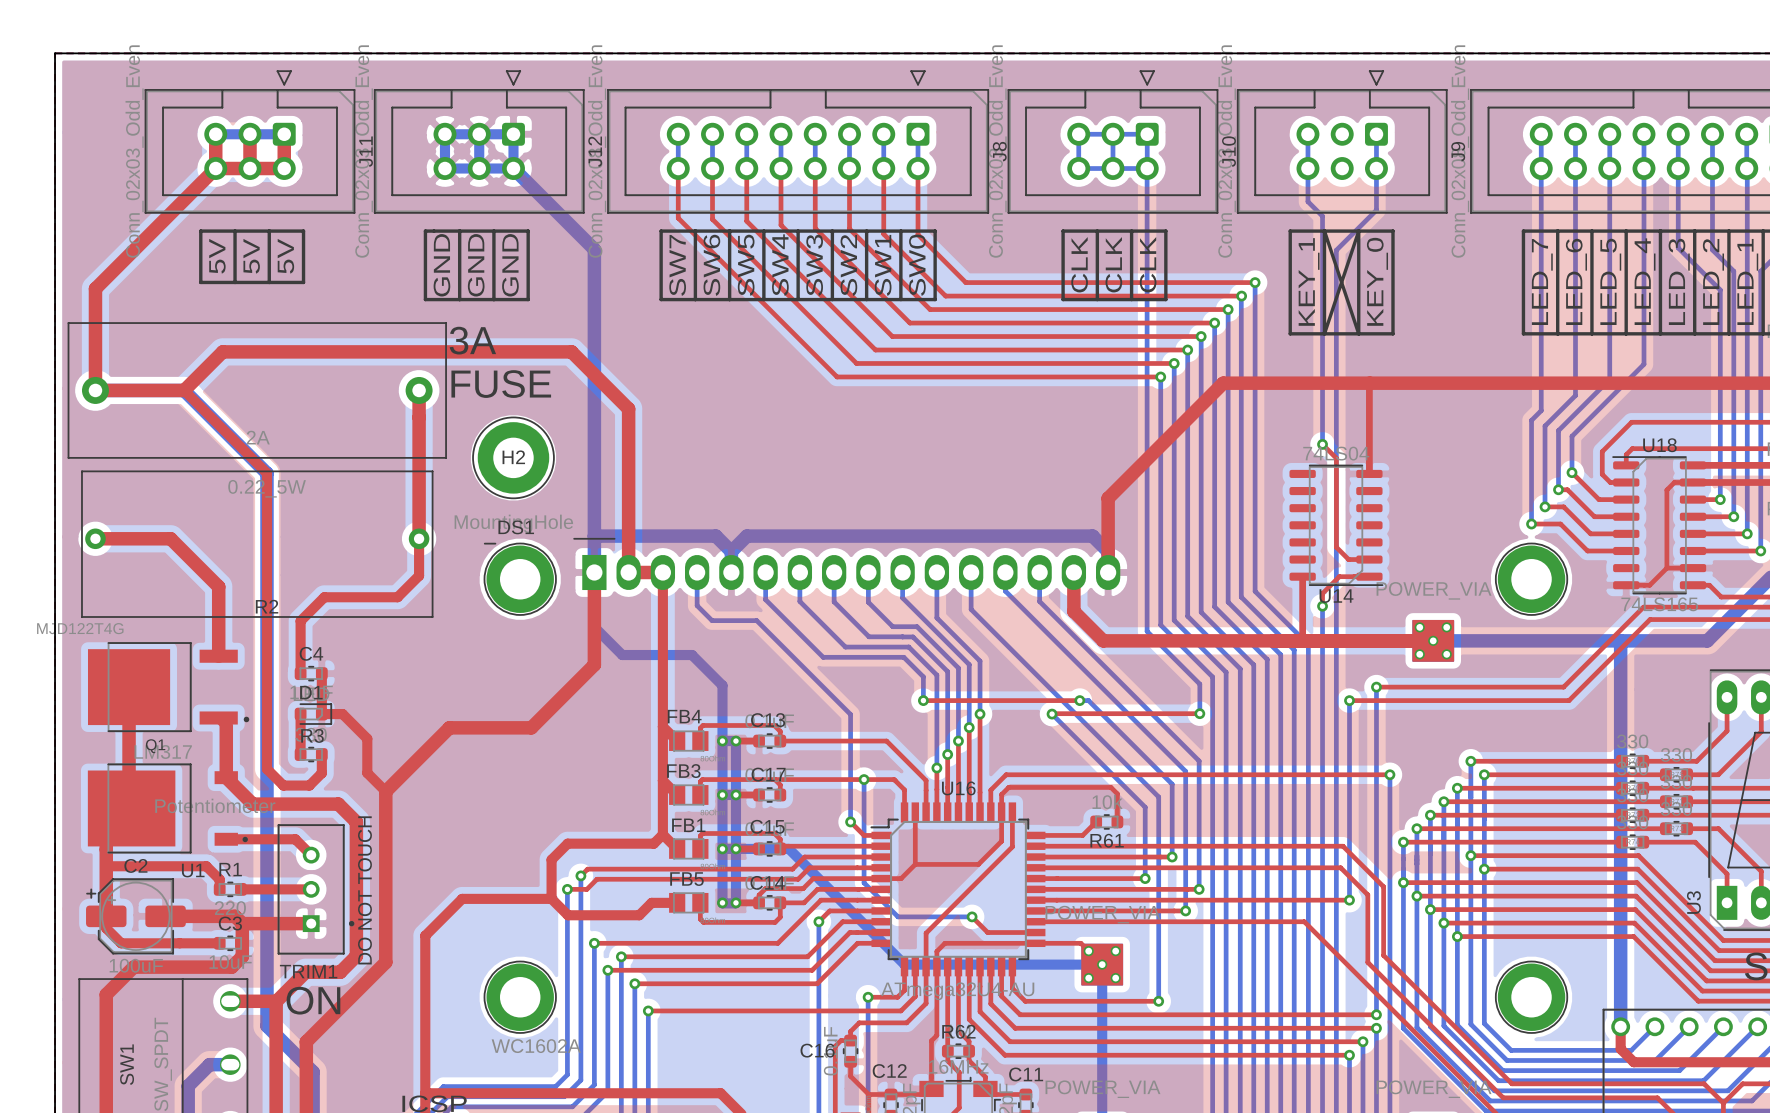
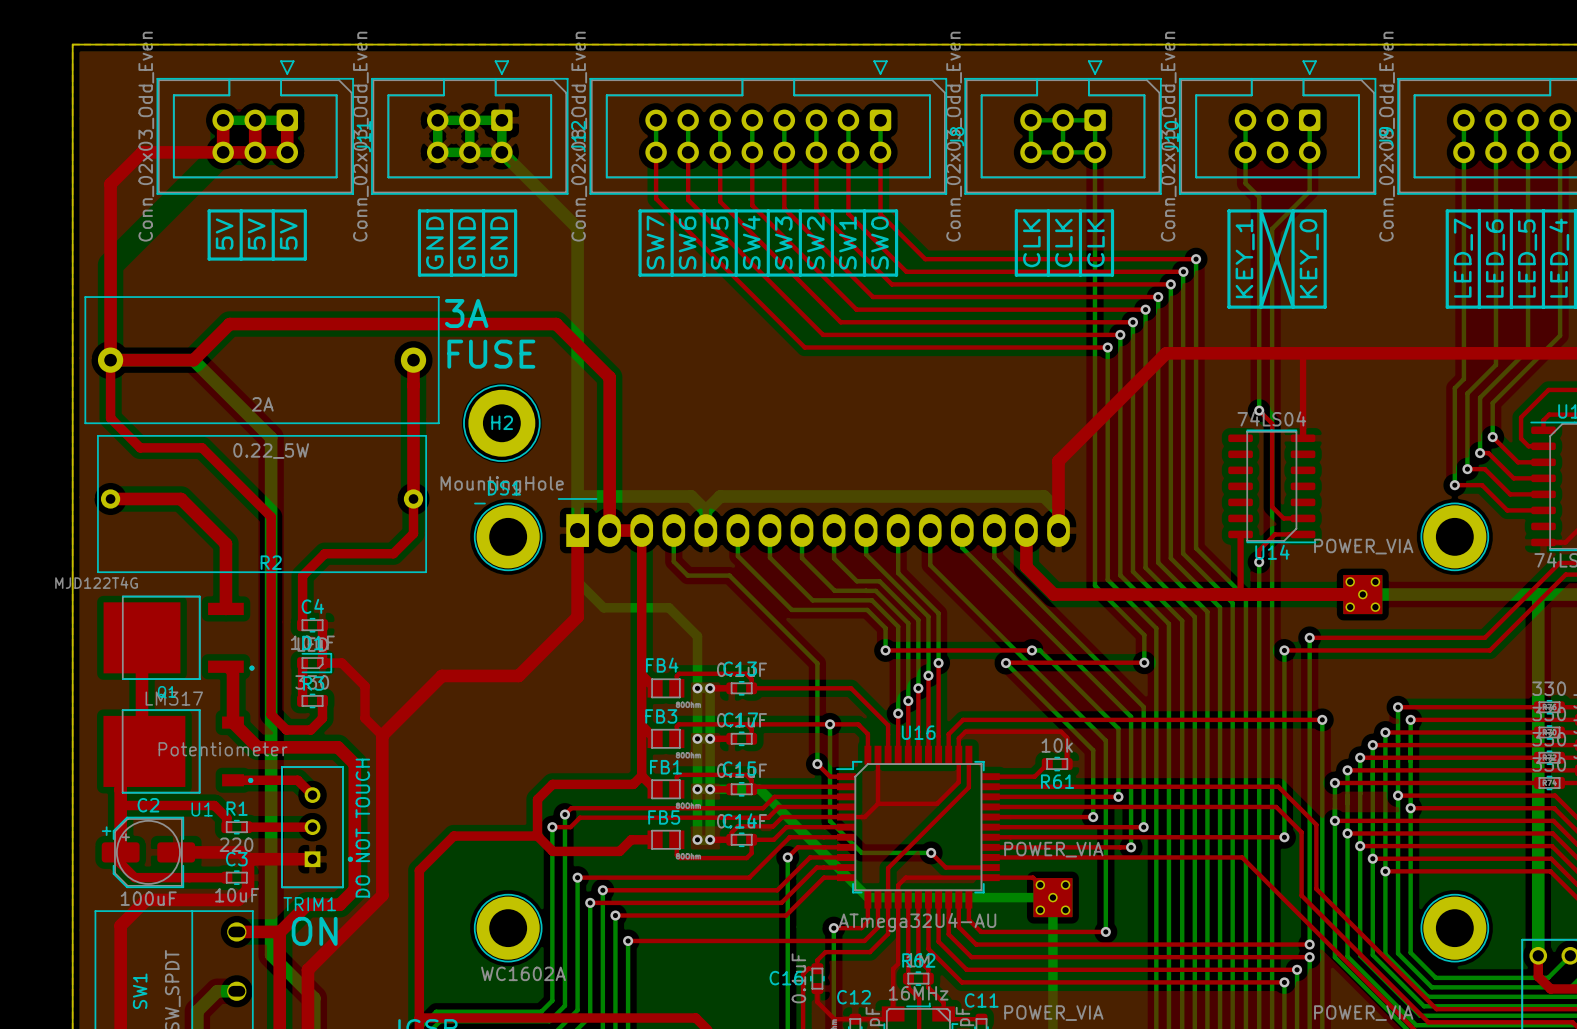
top track: (215, 168) (95, 288) -> (223, 152) (142, 152) (110, 184) (110, 264)
top track: (184, 390) (266, 473) (266, 557) -> (110, 360) (110, 418) (140, 447) (202, 447) (271, 516)

